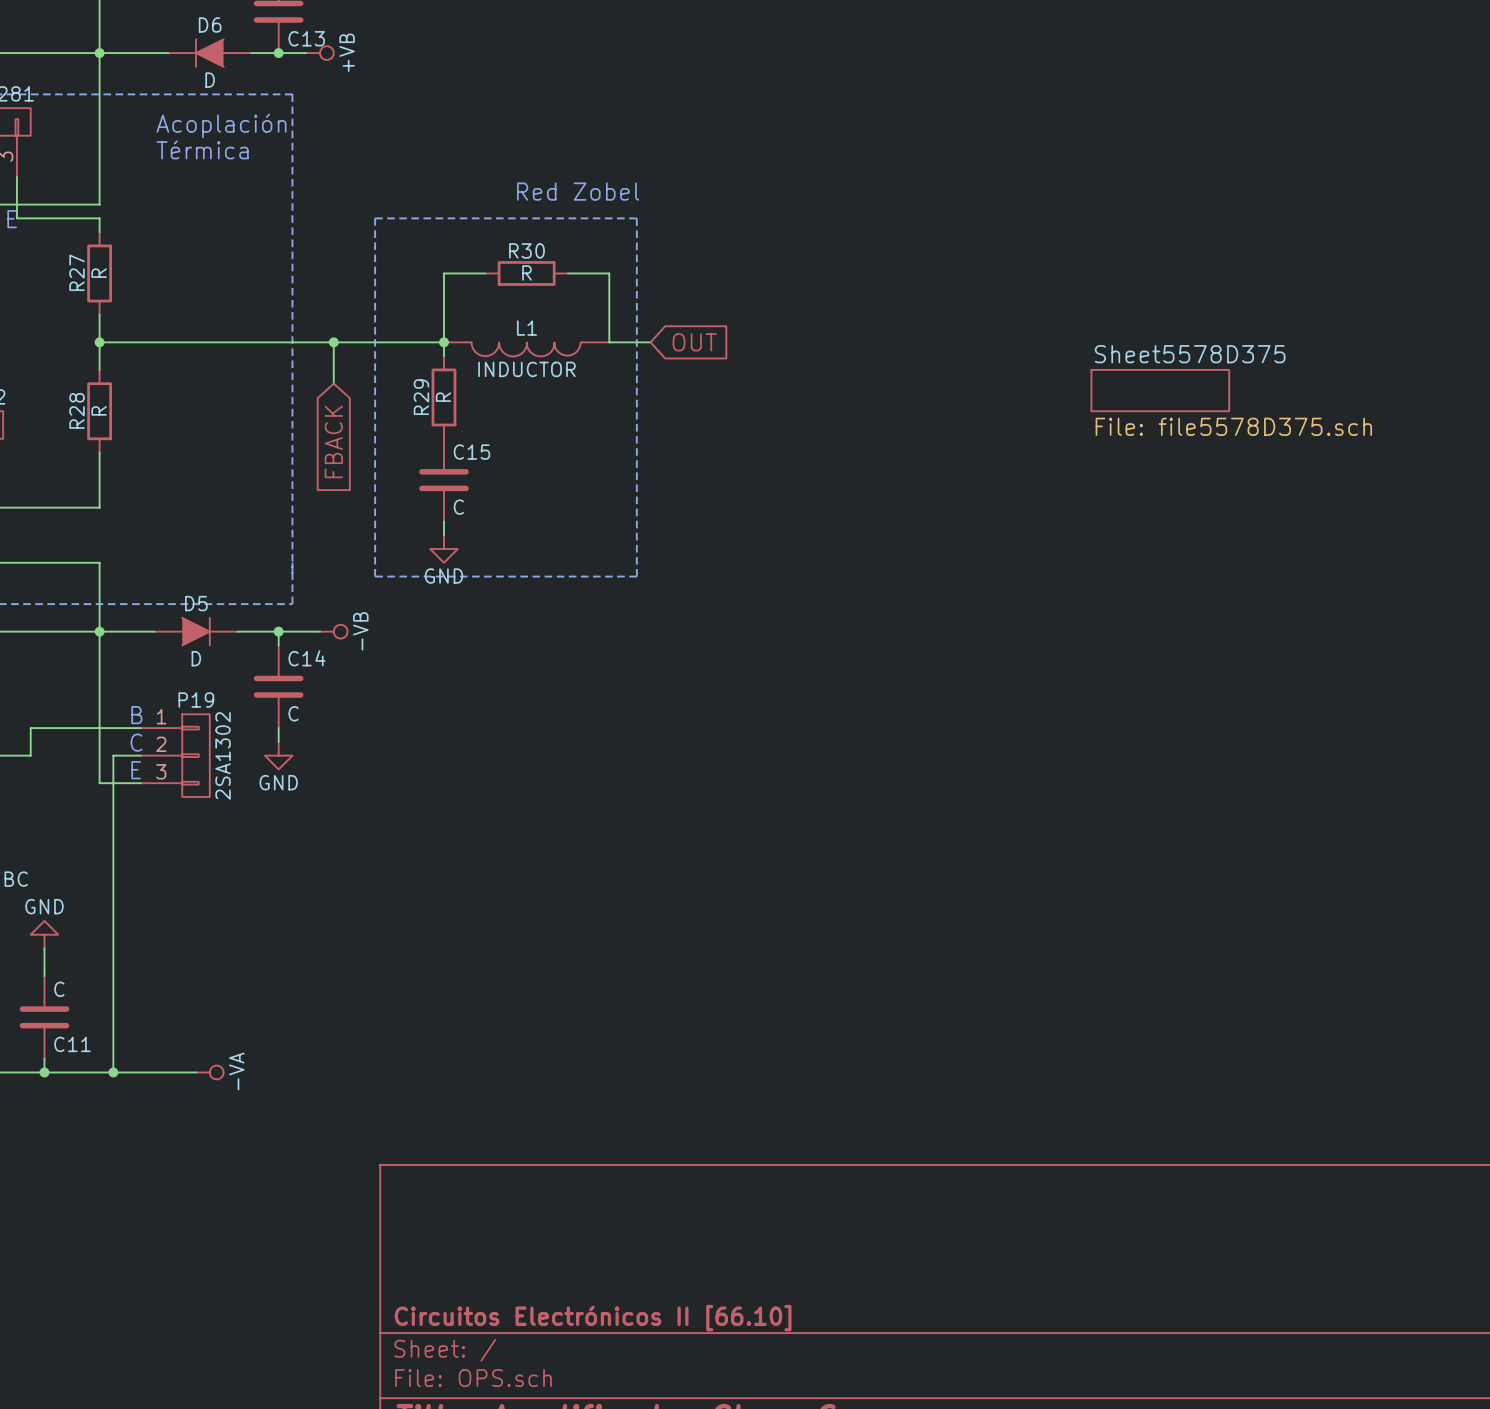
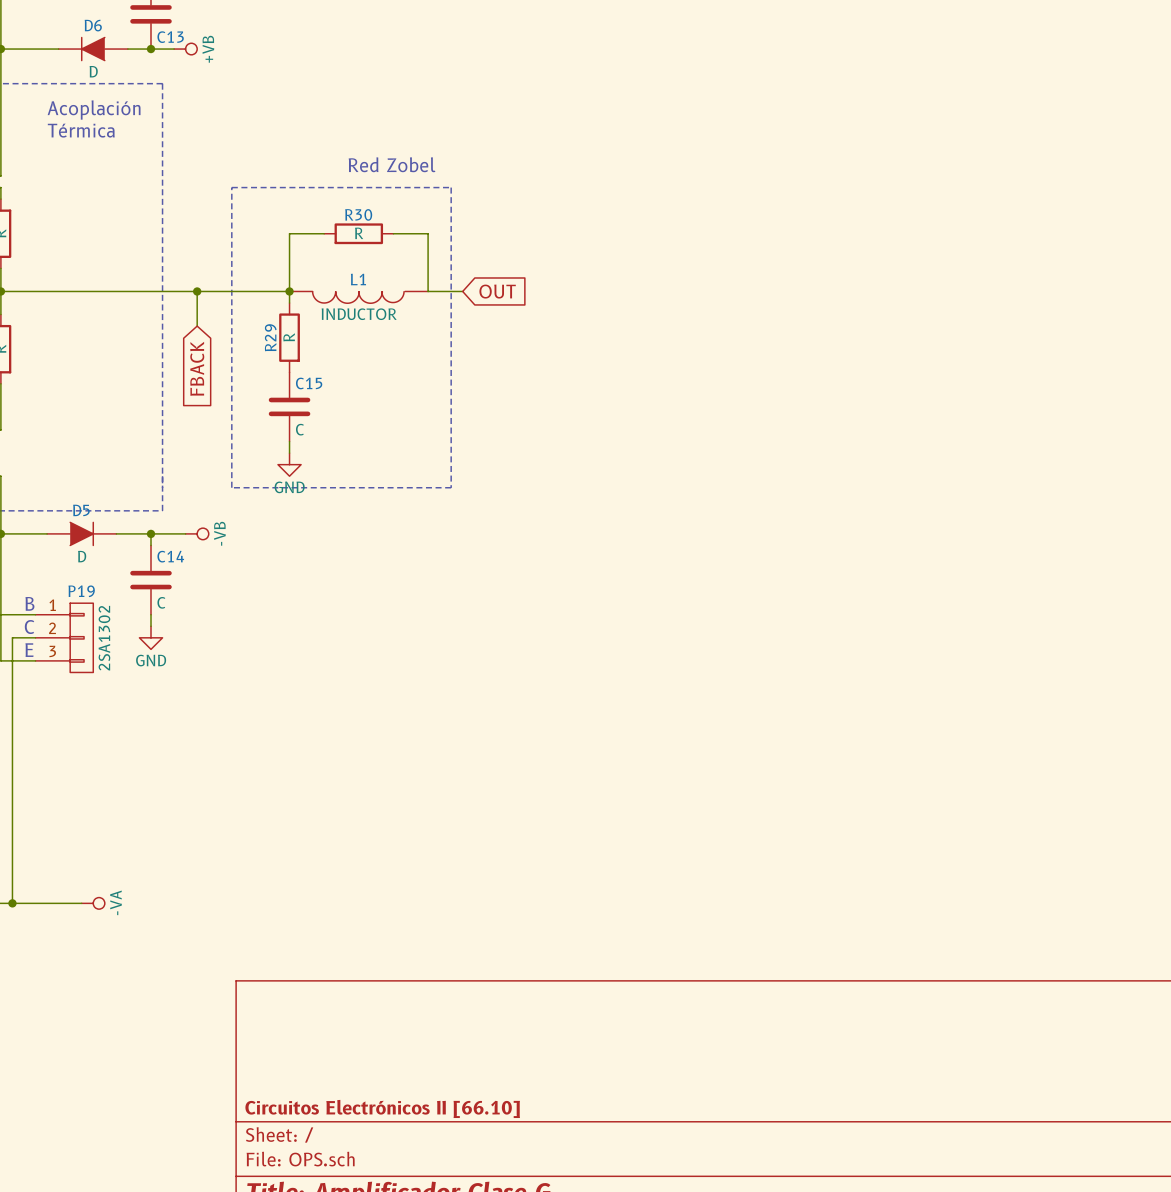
sheet Sheet5578D375: File: file5578D375.sch (1160, 390) -> none

